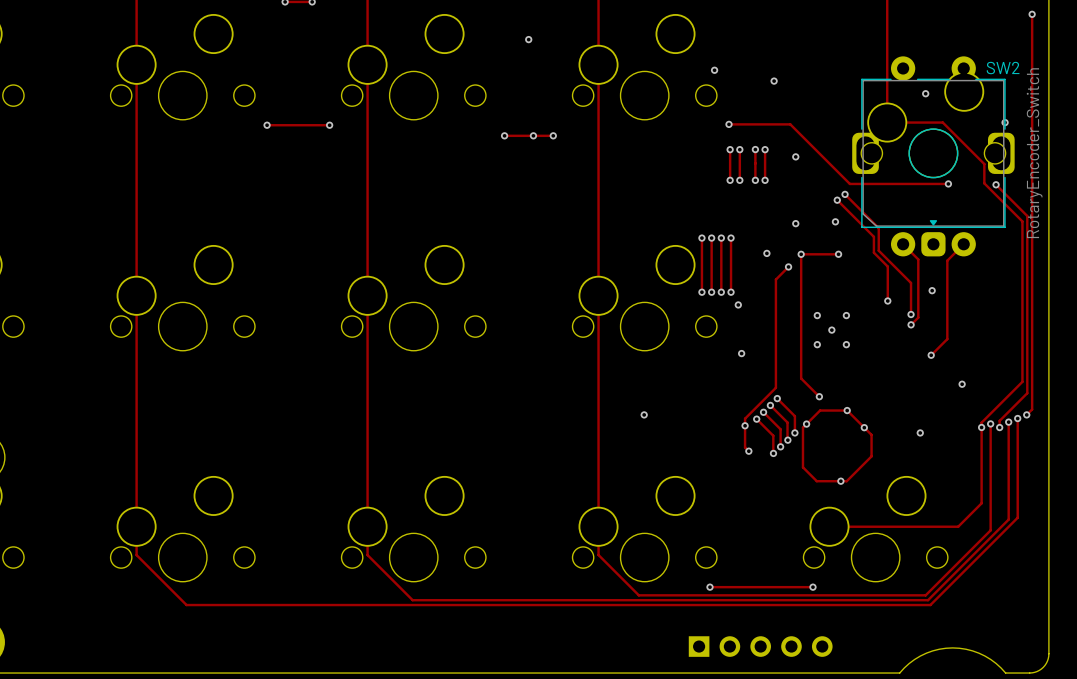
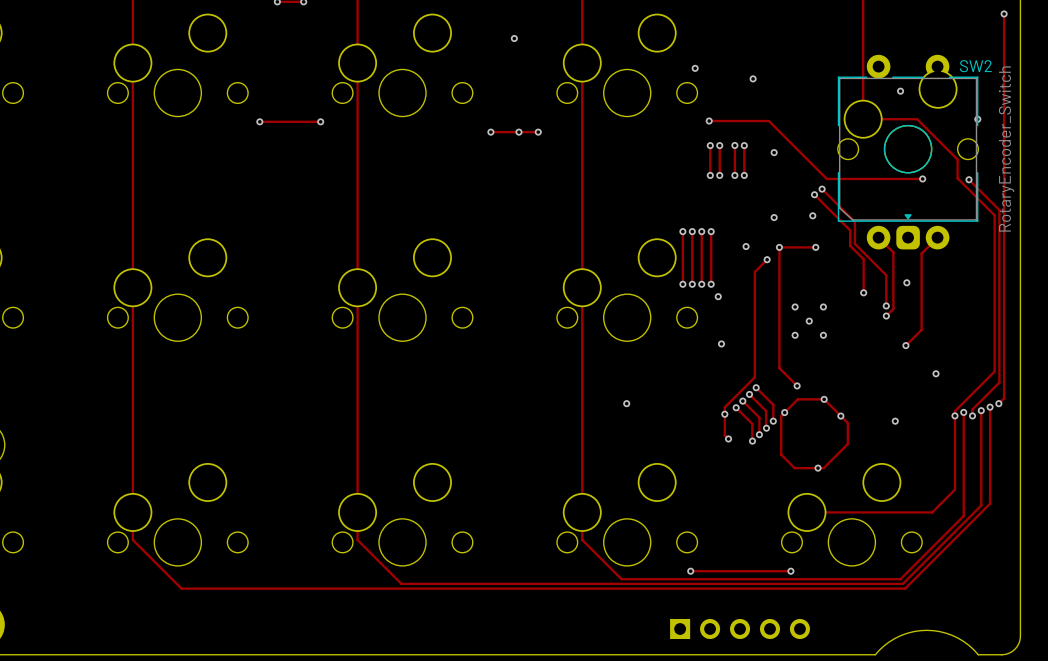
SW2 footprint: [852, 56, 1015, 257] -> [833, 54, 983, 250]

